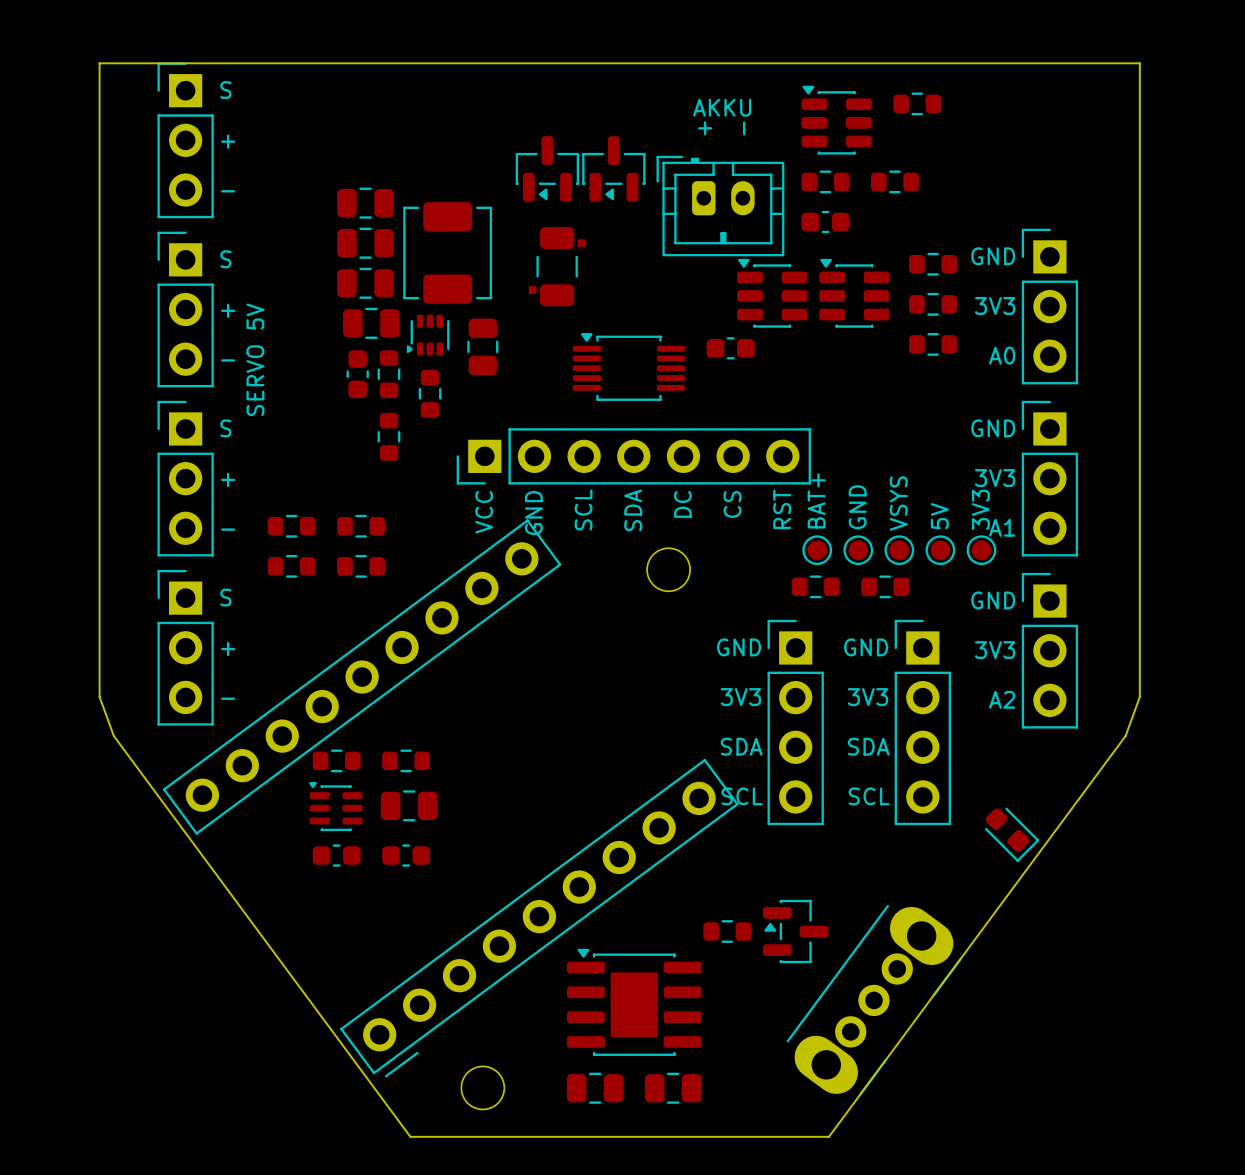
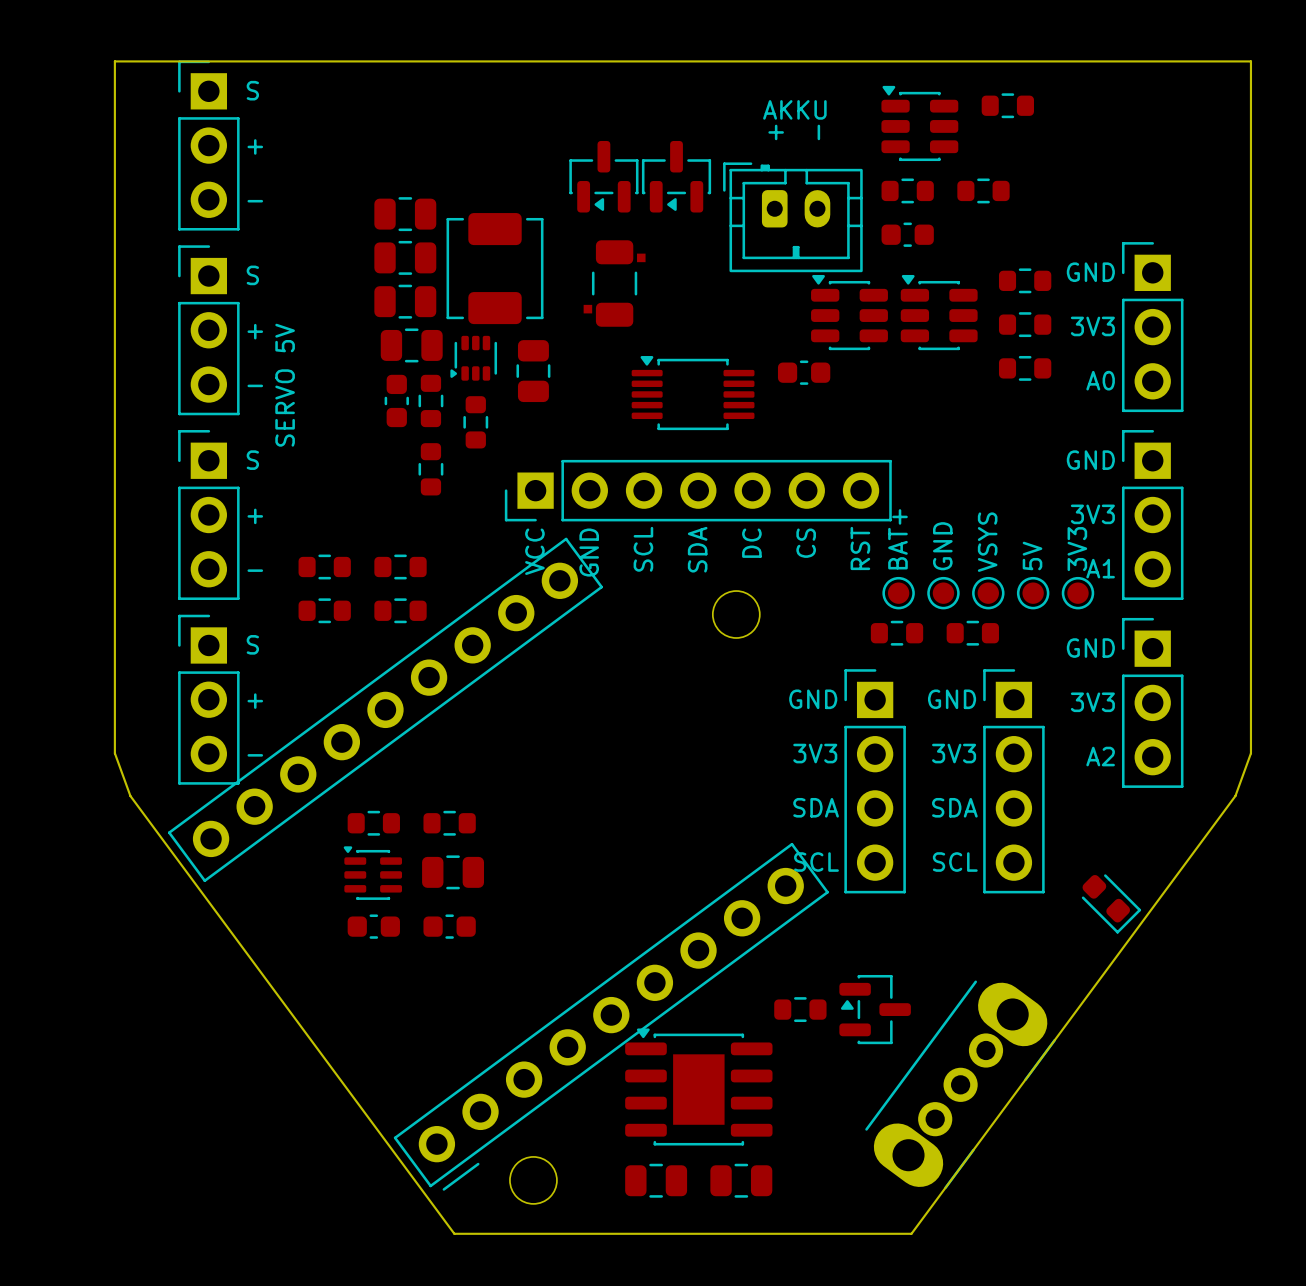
part footprint: [162, 519, 739, 1078] -> [167, 537, 829, 1191]

